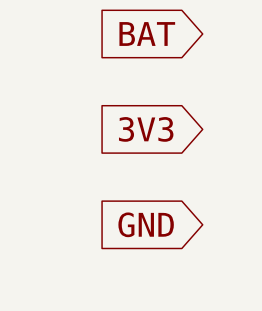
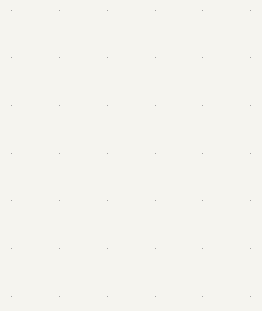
global label: BAT (147, 33) -> none
global label: 3V3 (146, 129) -> none
global label: GND (146, 224) -> none

